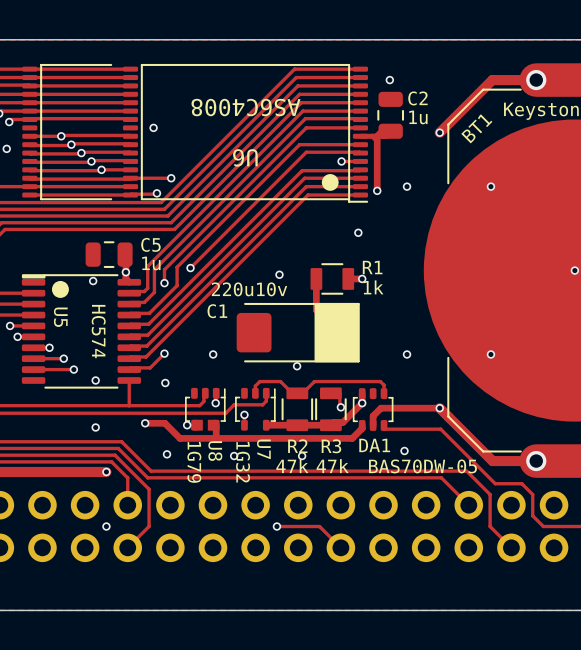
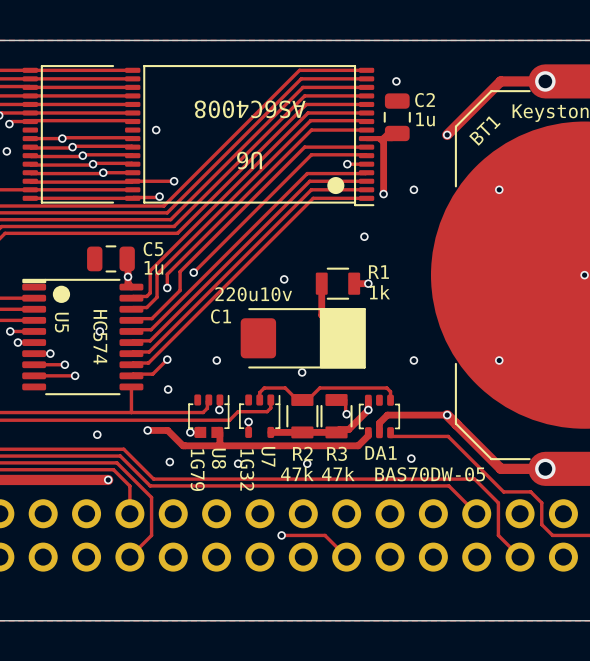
via: (93, 281) -> none
via: none -> (99, 331)
via: (95, 380) -> none
via: (106, 526) -> none

